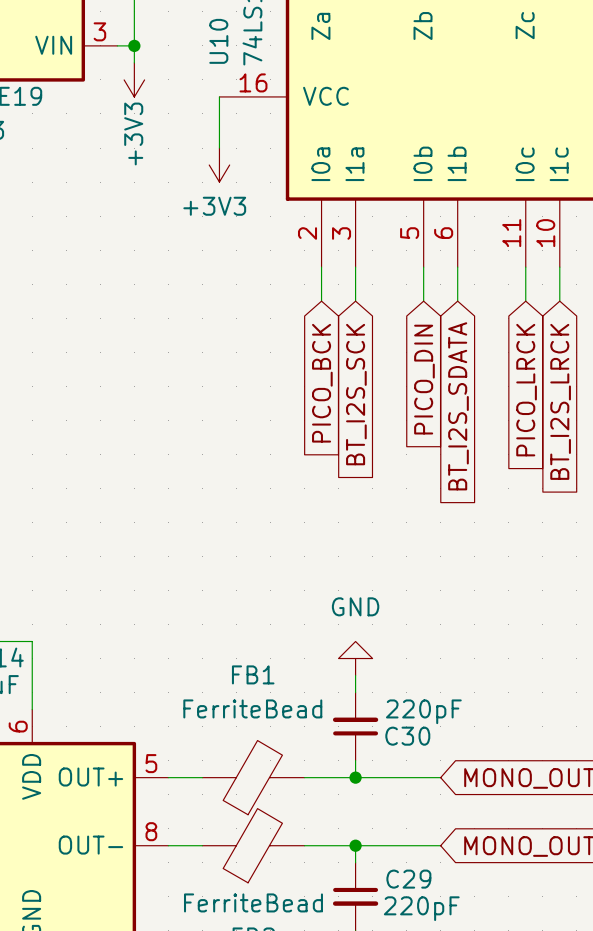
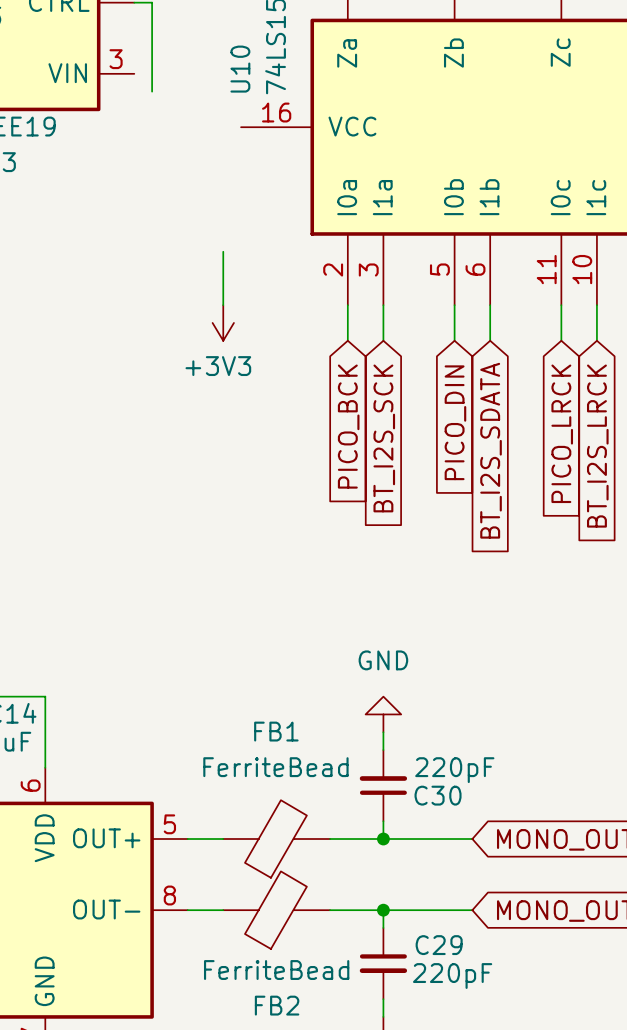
wire: (117, 45) (134, 45) -> none
junction: (134, 45) -> none
power symbol: +3V3 (134, 79) -> none
wire: (219, 96) (219, 148) -> (223, 251) (223, 305)
power symbol: +3V3 (219, 165) -> none
power symbol: none -> +3V3 (223, 322)

